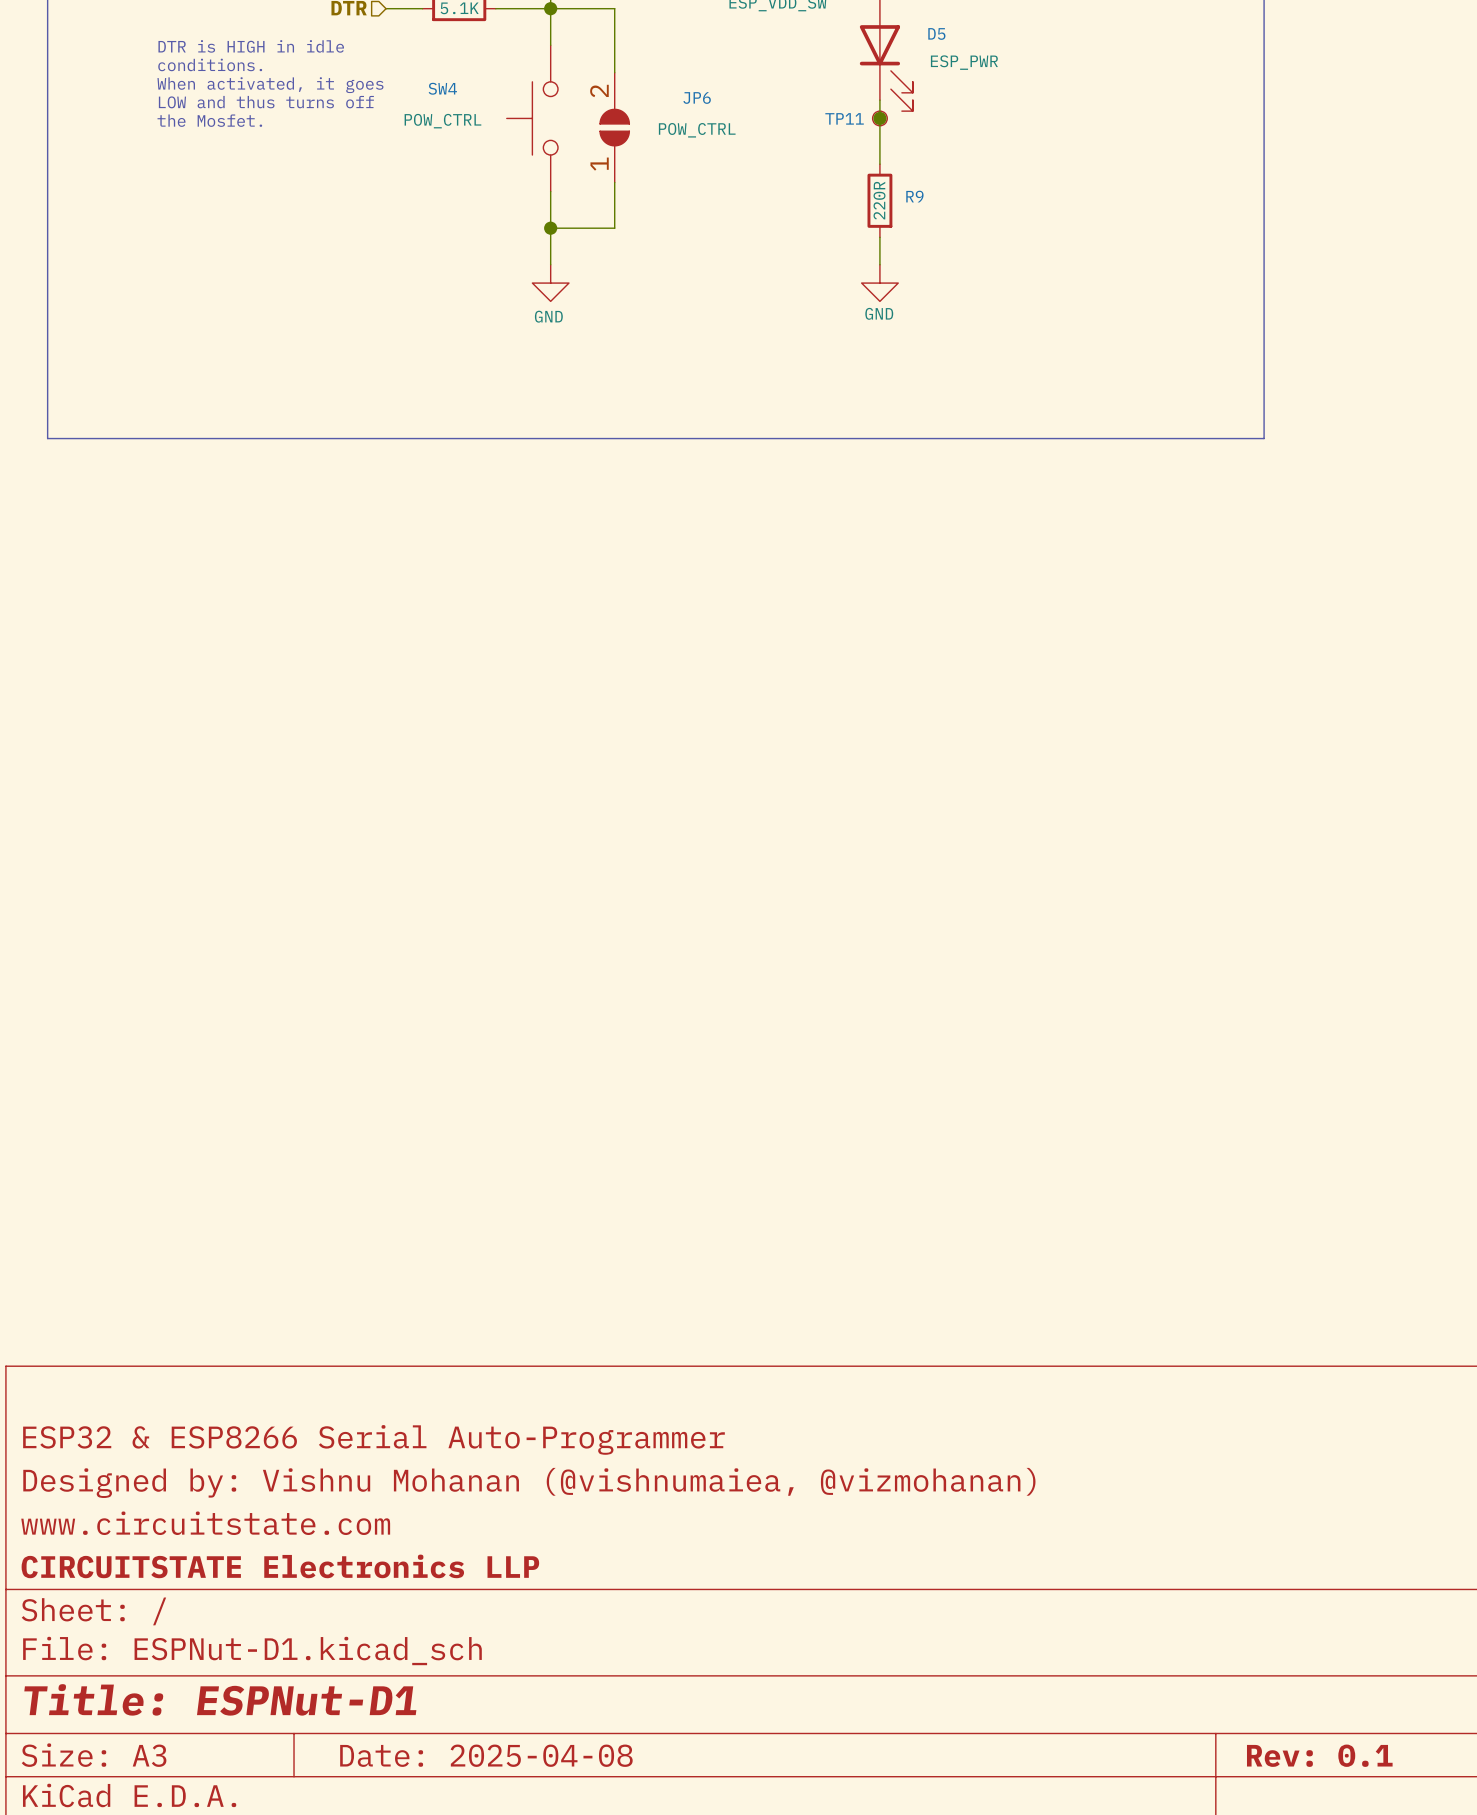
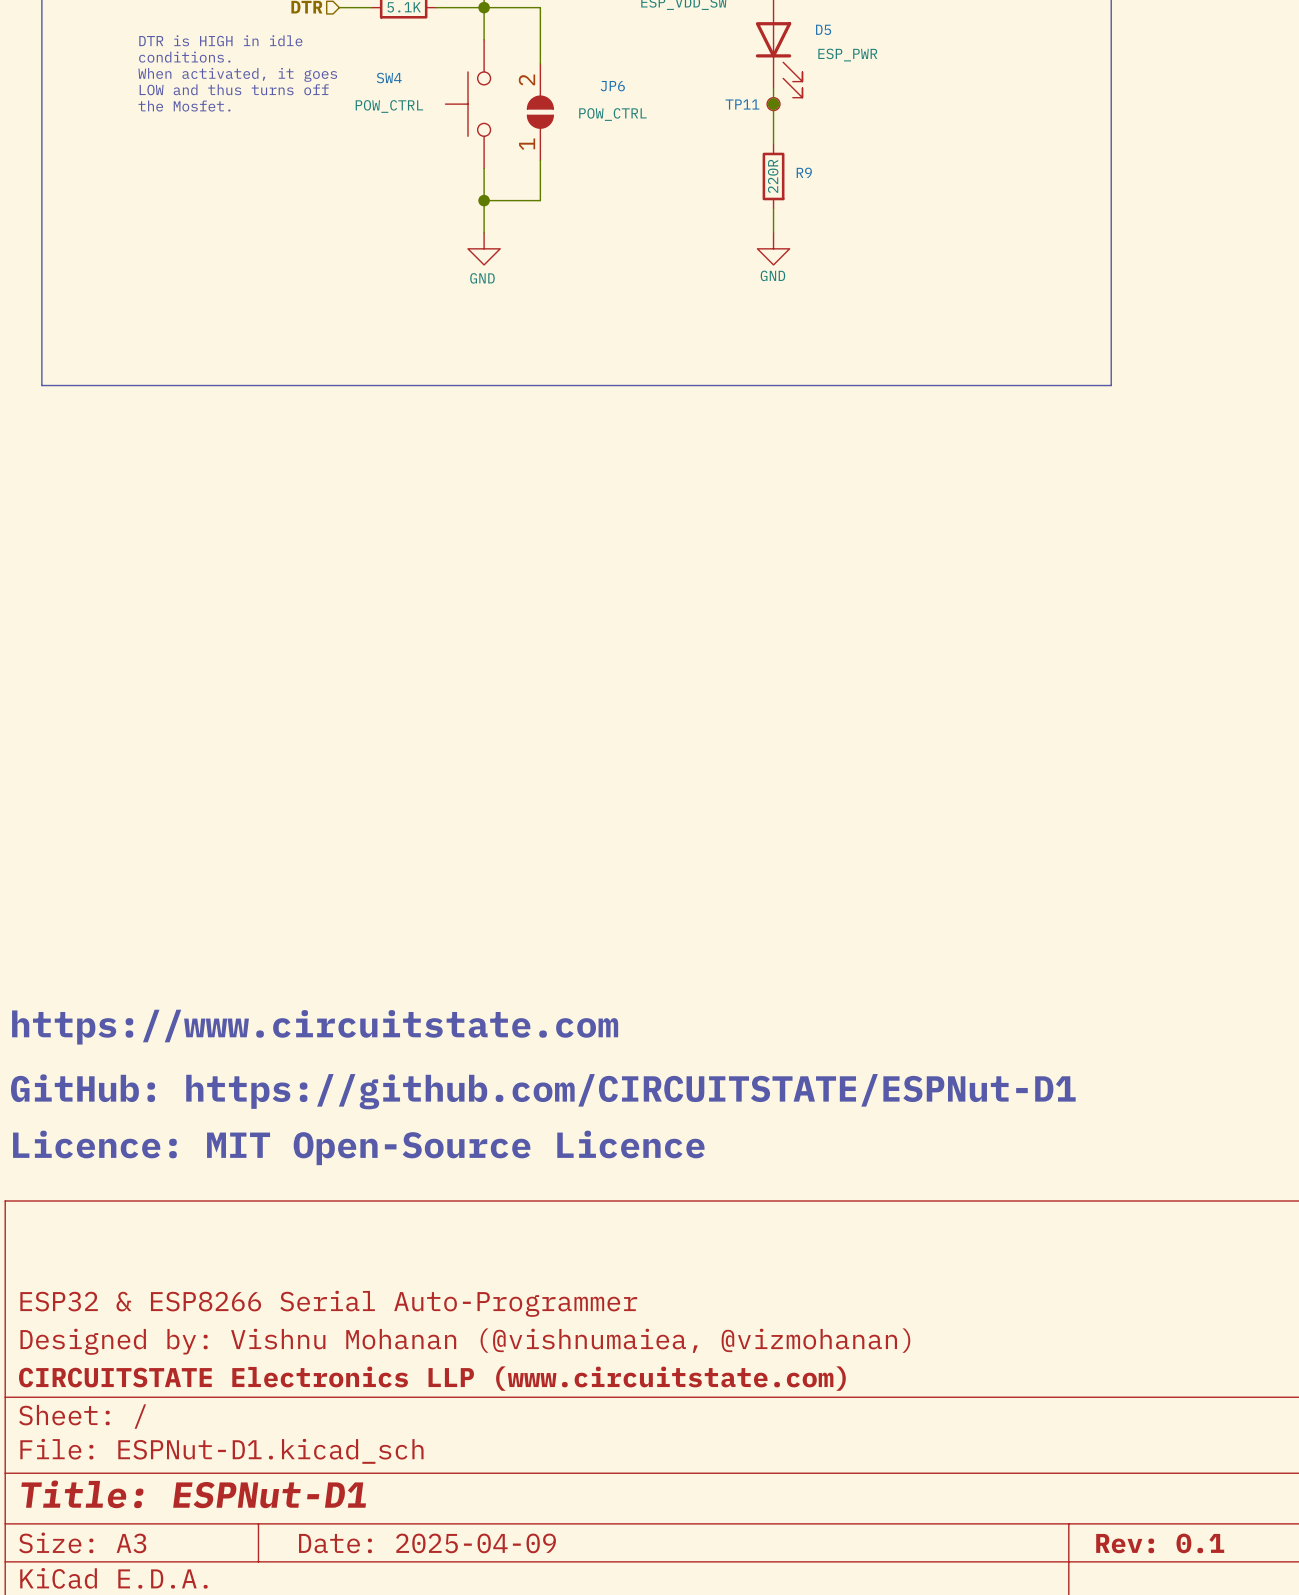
text: none -> https://www.circuitstate.com (315, 1027)
text: none -> GitHub: https://github.com/CIRCUITSTATE/ESPNut-D1 (543, 1091)
text: none -> Licence: MIT Open-Source Licence (358, 1147)
title block: ESP32 & ESP8266 Serial Auto-Programmer (373, 1439) -> none
title block: Designed by: Vishnu Mohanan (@vishnumaiea, @vizmohanan) (529, 1482) -> ESP32 & ESP8266 Serial Auto-Programmer (328, 1303)
title block: www.circuitstate.com (205, 1523) -> Designed by: Vishnu Mohanan (@vishnumaiea, @vizmohanan) (465, 1341)
title block: CIRCUITSTATE Electronics LLP (280, 1566) -> CIRCUITSTATE Electronics LLP (www.circuitstate.com) (432, 1378)
title block: Date: 2025-04-08 (486, 1755) -> Date: 2025-04-09 (427, 1543)

